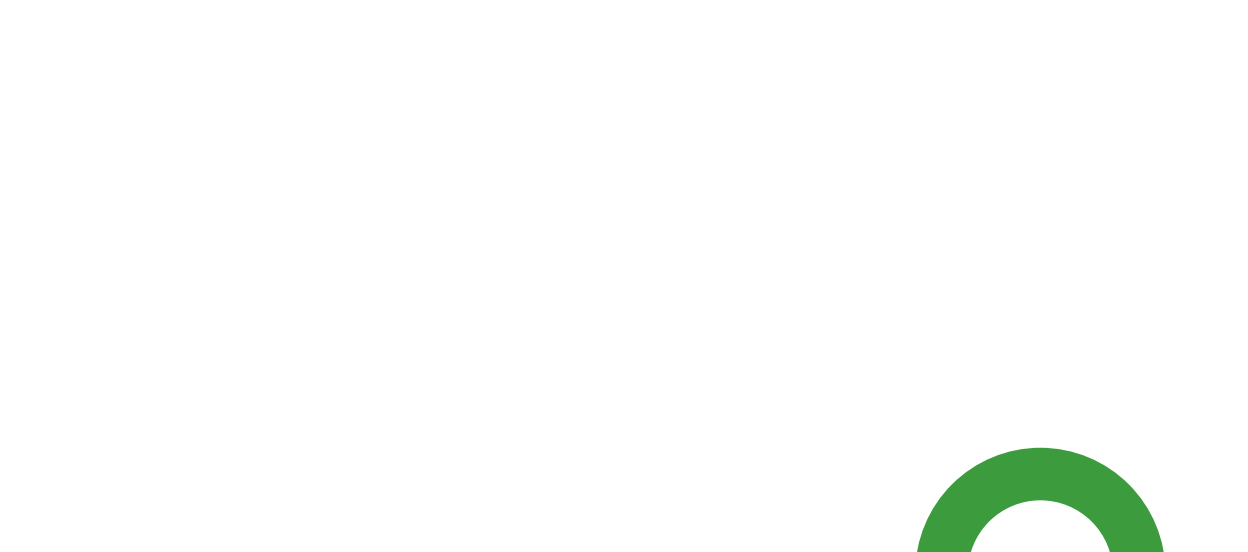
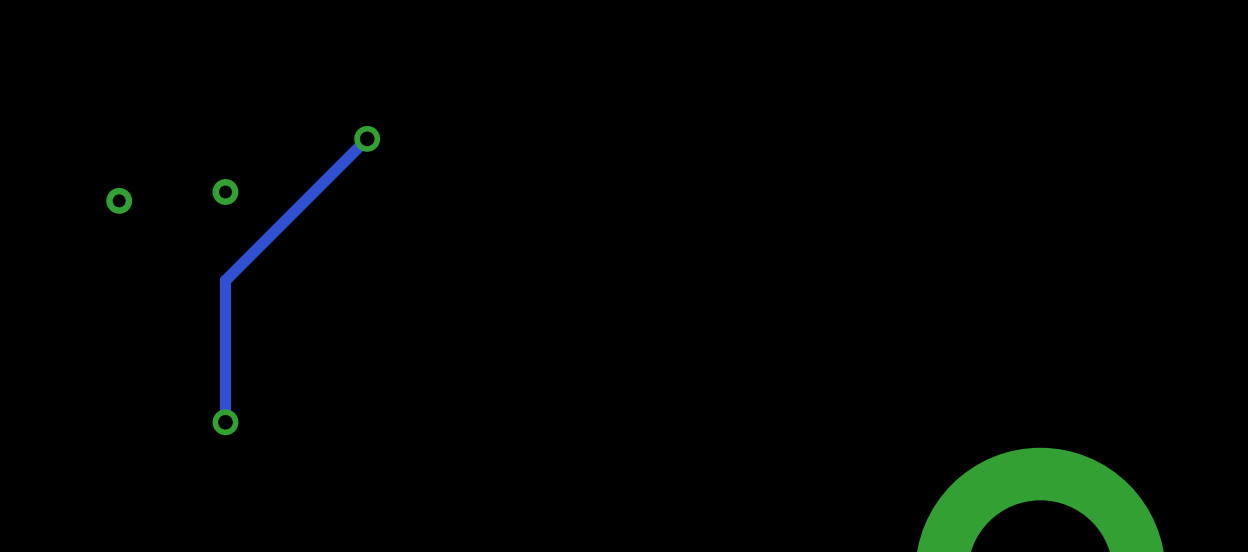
track: none -> (367, 138) (225, 280) (225, 422)
via: none -> (367, 138)
via: none -> (225, 191)
via: none -> (119, 200)
via: none -> (225, 422)

